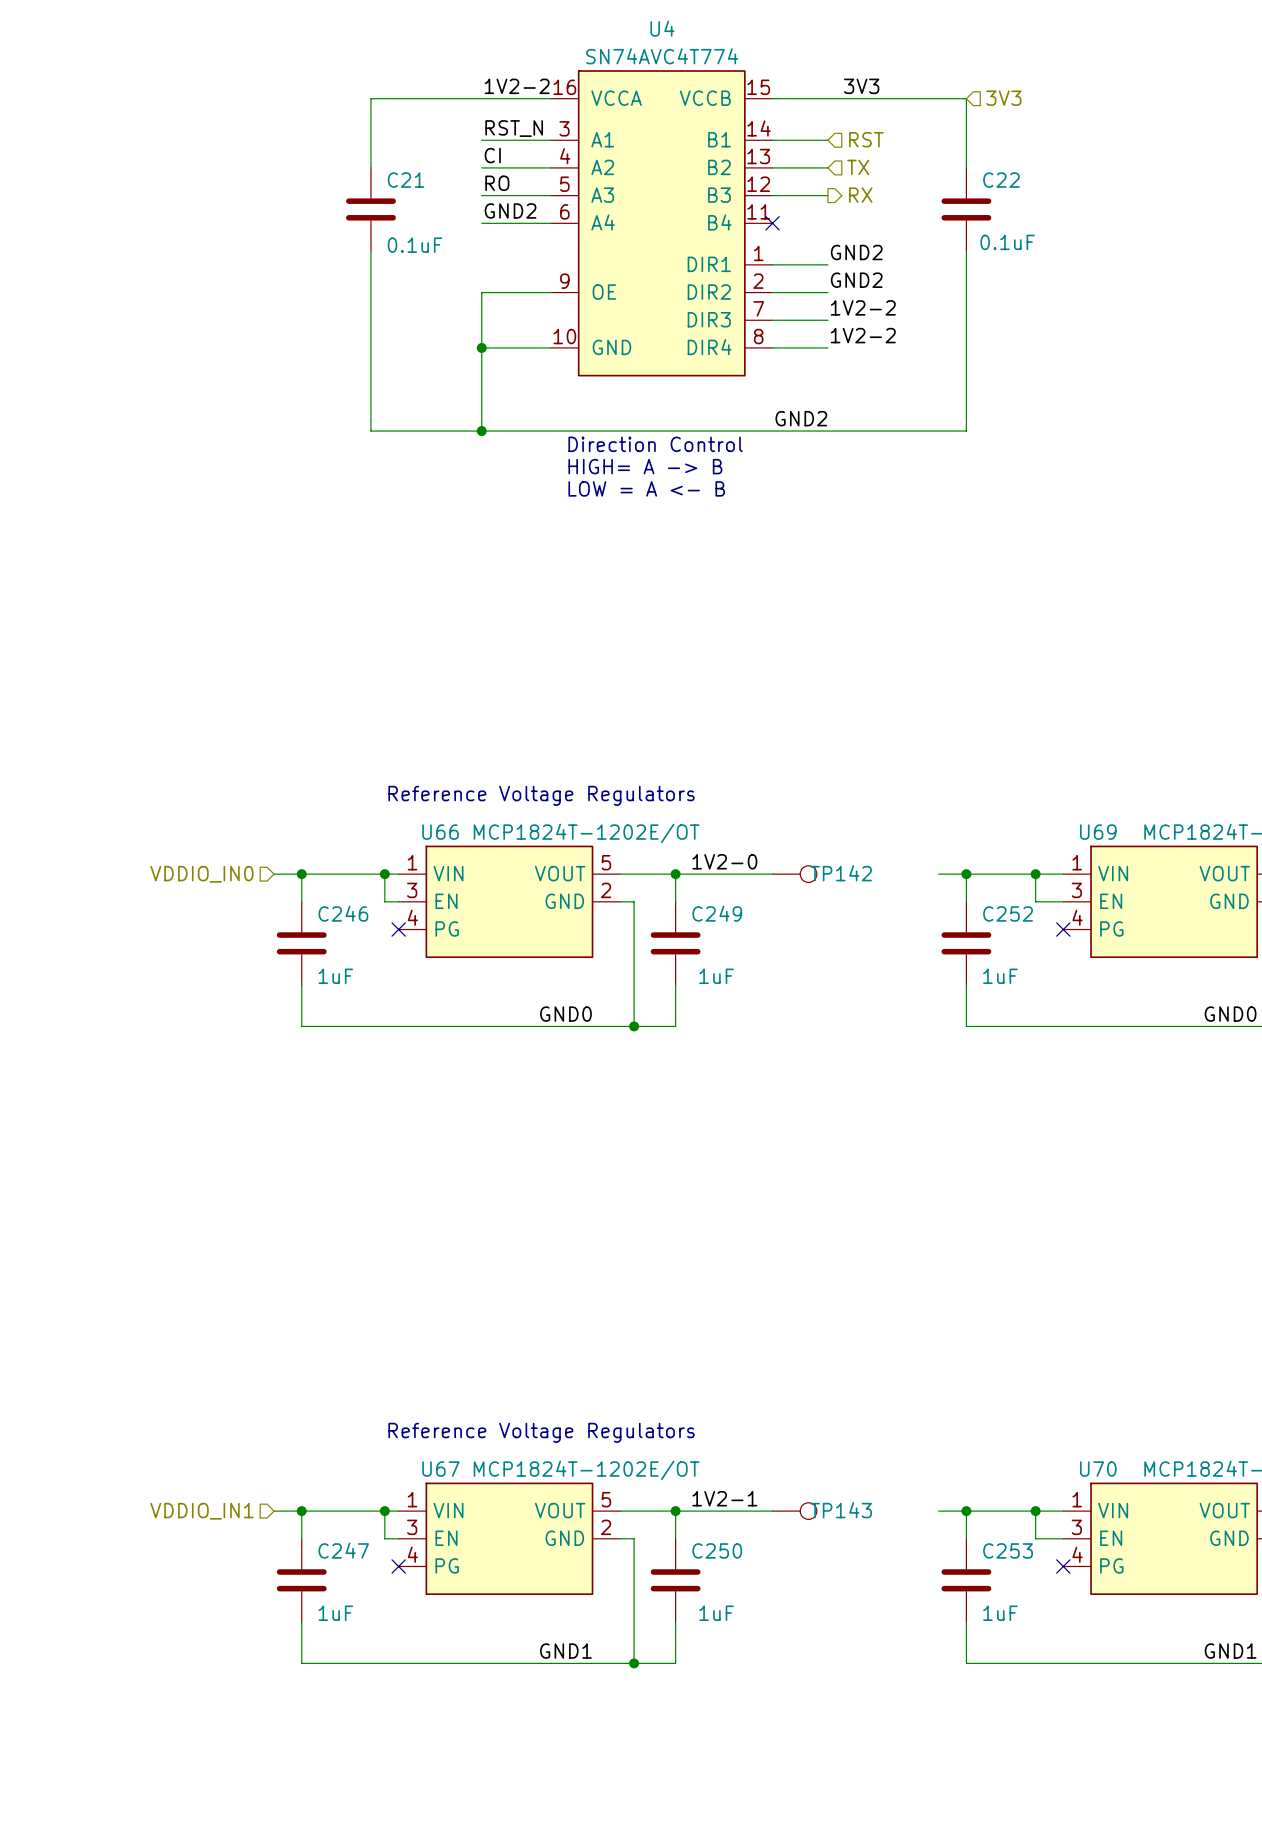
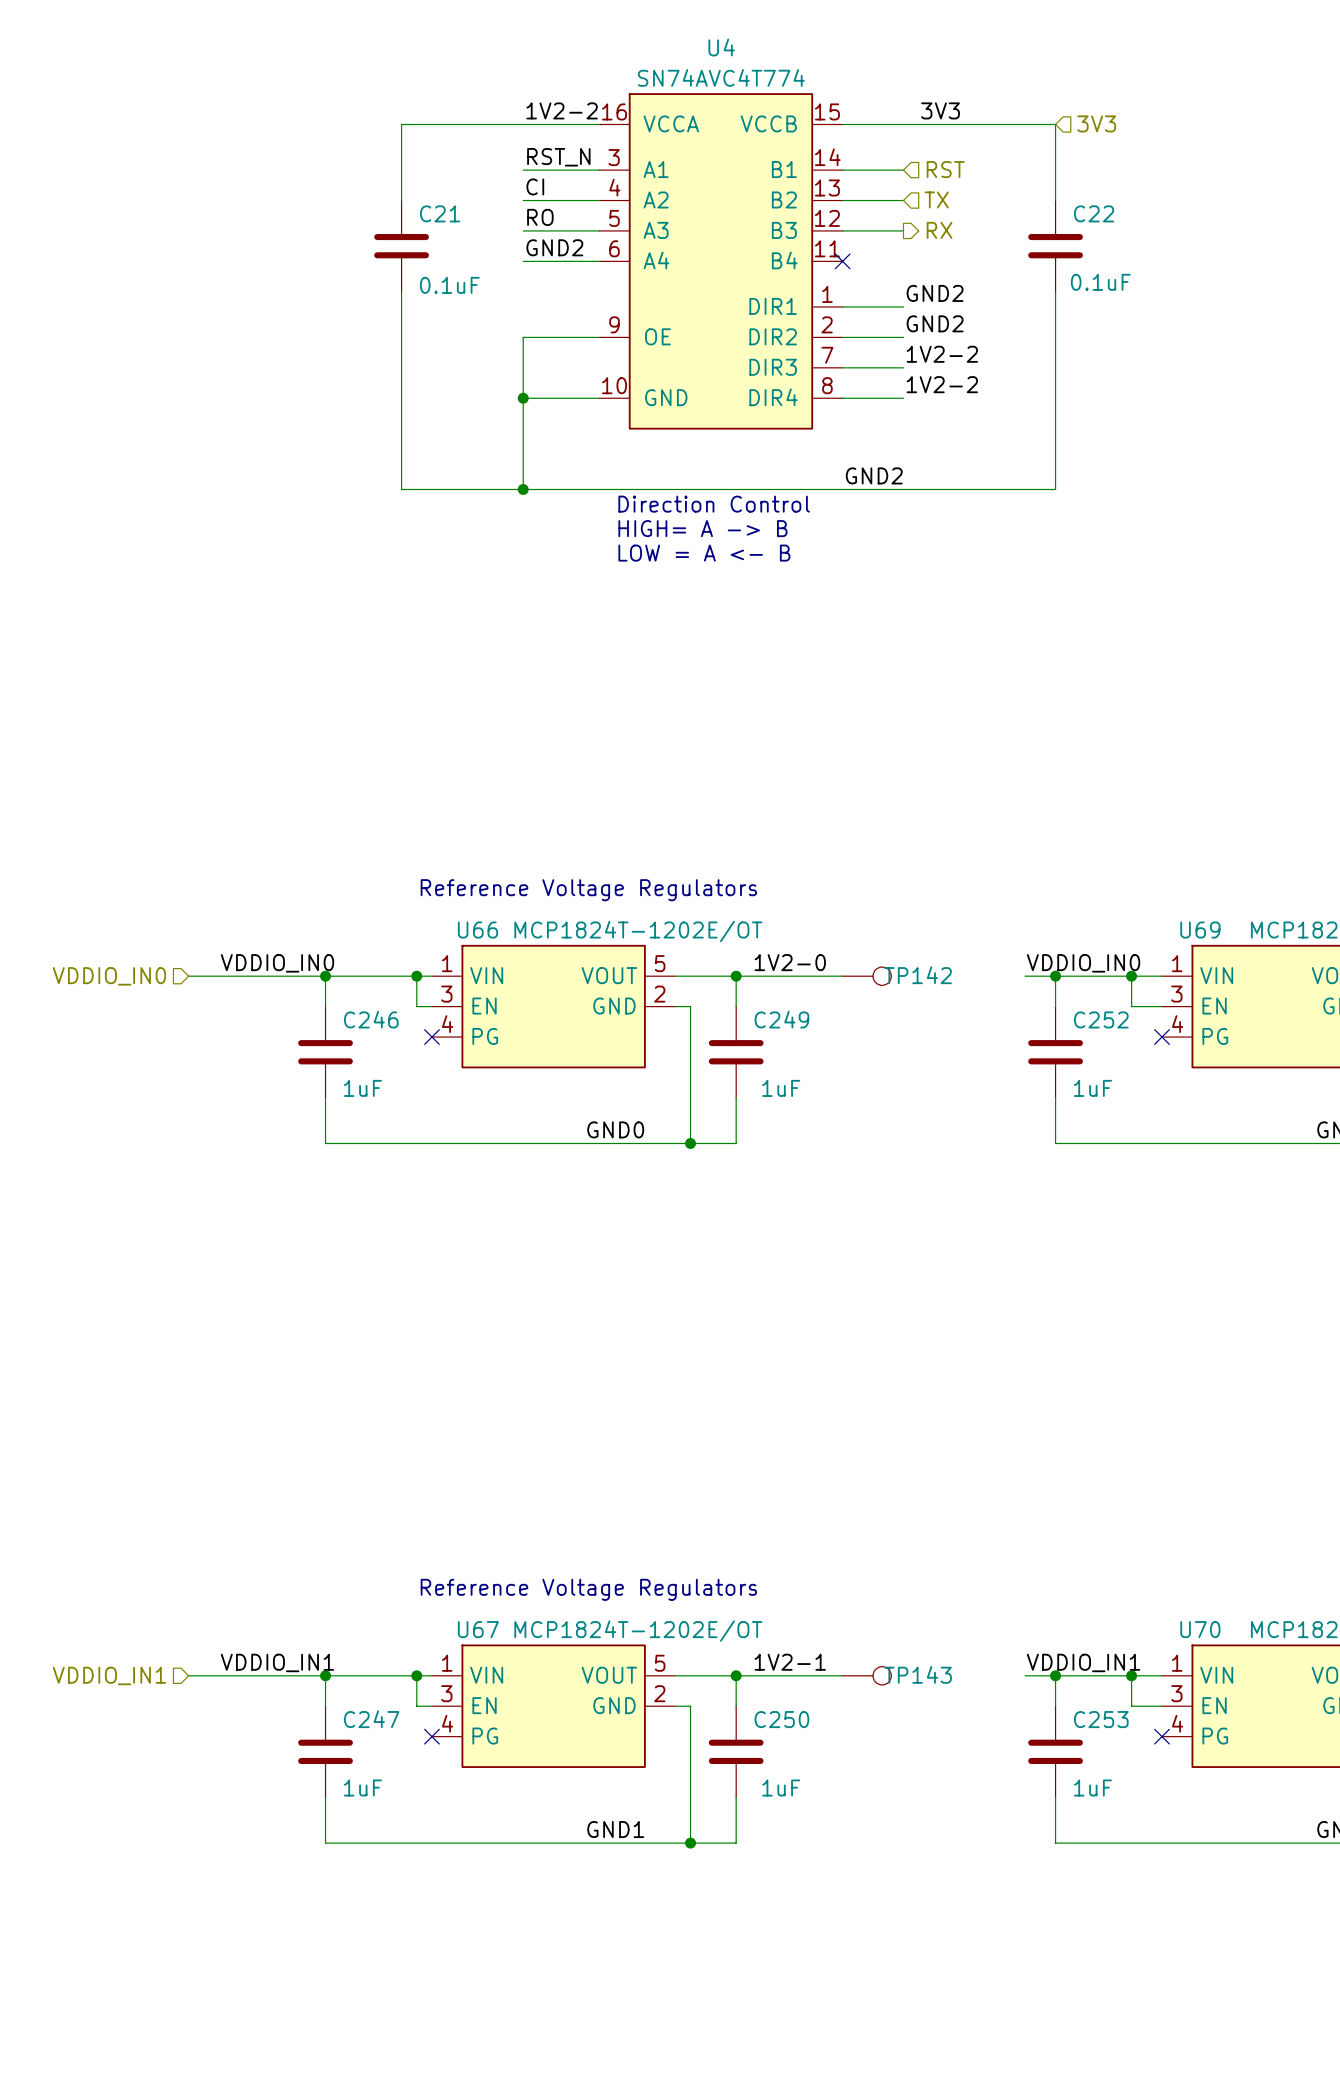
label: none -> VDDIO_IN0 (277, 963)
label: none -> VDDIO_IN0 (1083, 963)
wire: none -> (188, 976) (295, 976)
hierarchical label position: VDDIO_IN0 (201, 874) -> VDDIO_IN0 (109, 976)
label: none -> VDDIO_IN1 (277, 1662)
label: none -> VDDIO_IN1 (1083, 1662)
wire: none -> (188, 1675) (295, 1675)
hierarchical label position: VDDIO_IN1 (201, 1511) -> VDDIO_IN1 (109, 1675)

